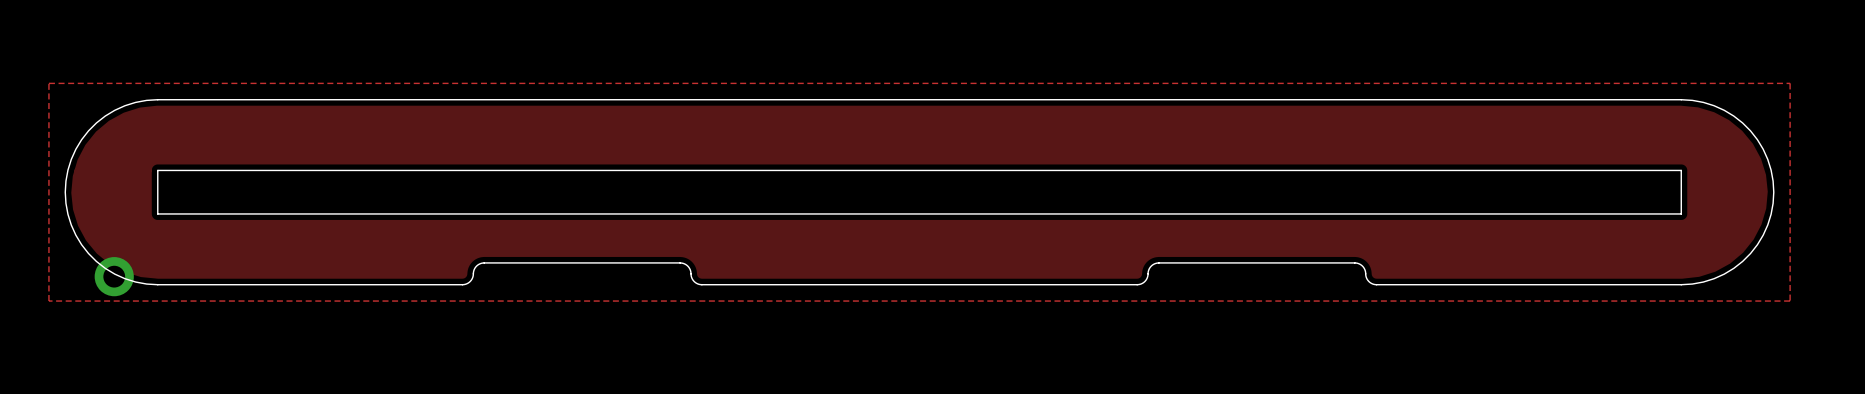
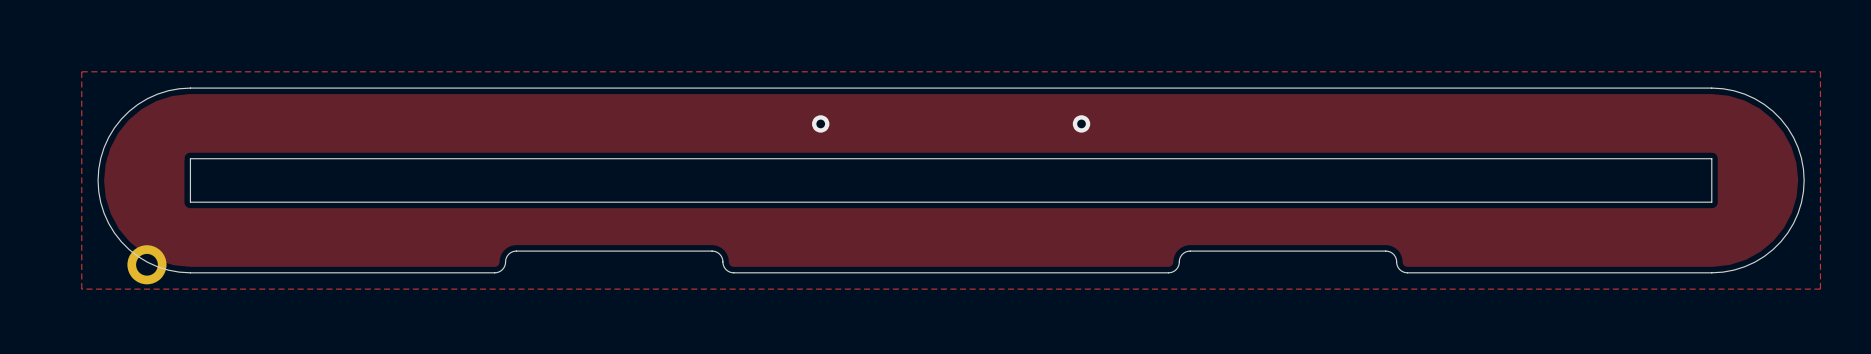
via: none -> (820, 123)
via: none -> (1081, 123)

